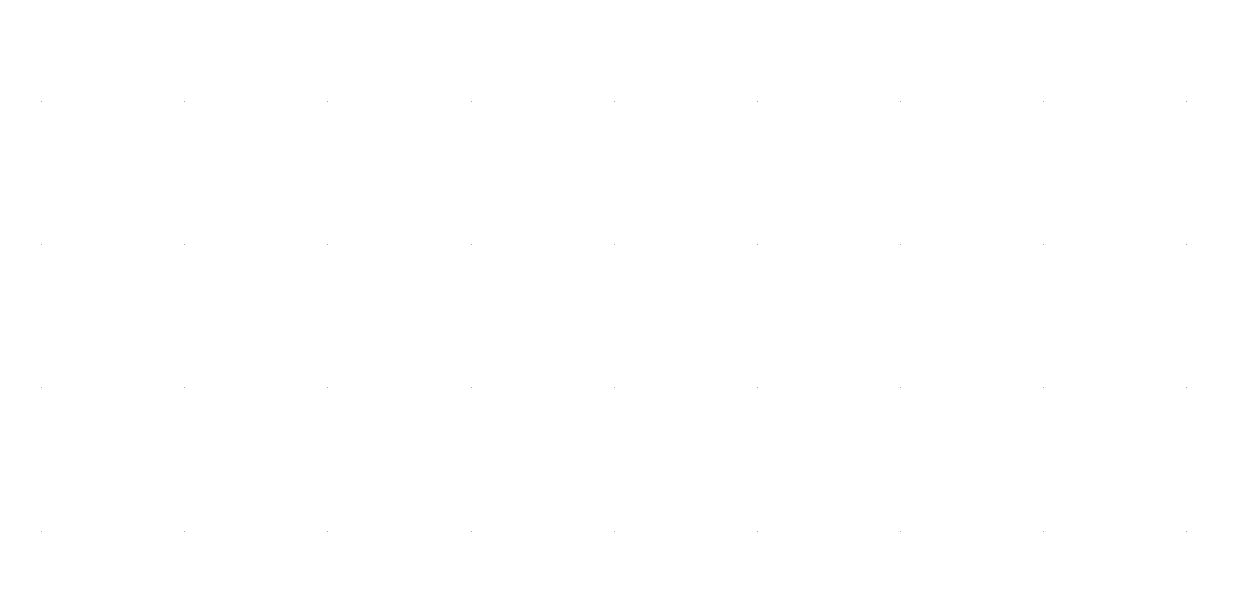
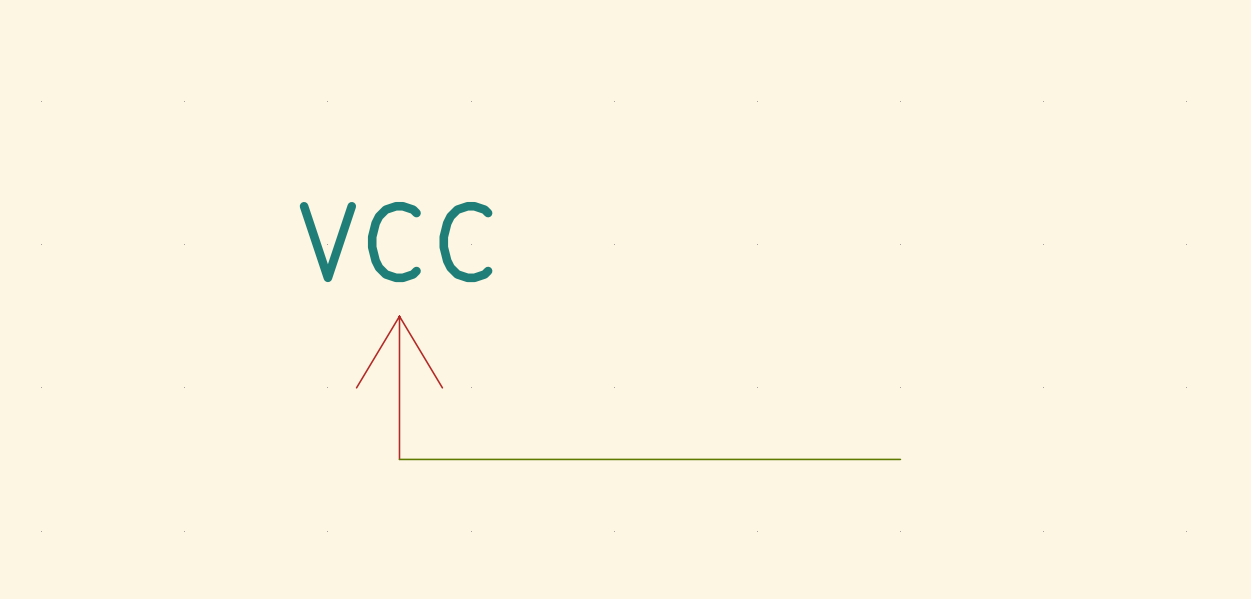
power symbol: none -> VCC (399, 387)
wire: none -> (399, 459) (900, 459)

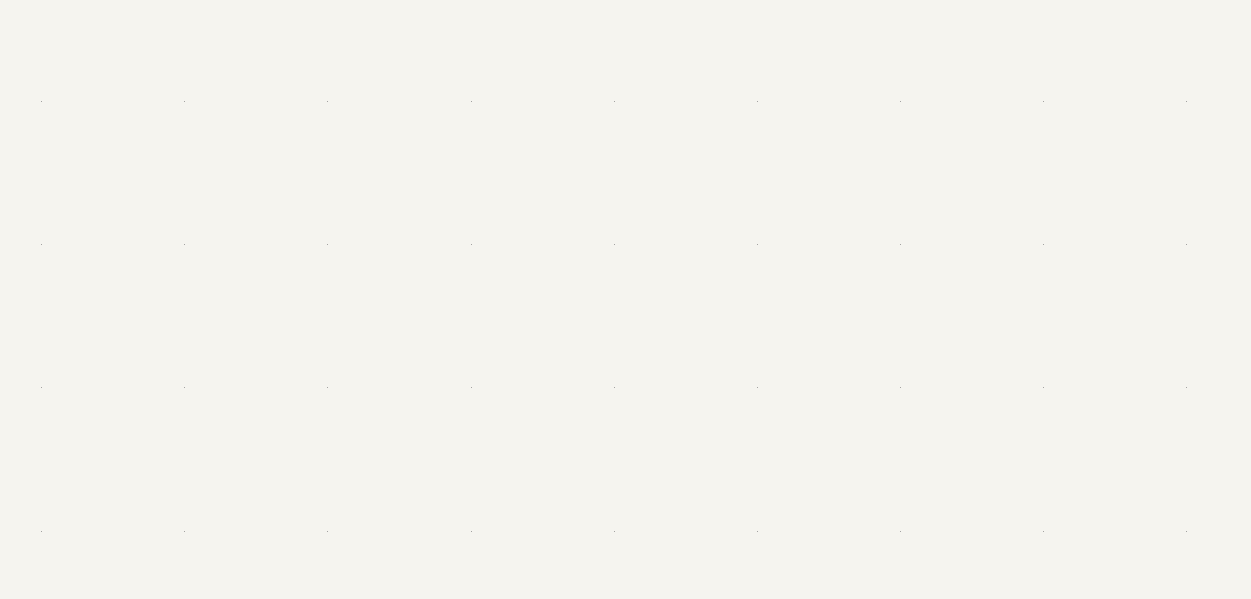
power symbol: VCC (399, 387) -> none
wire: (399, 459) (900, 459) -> none

